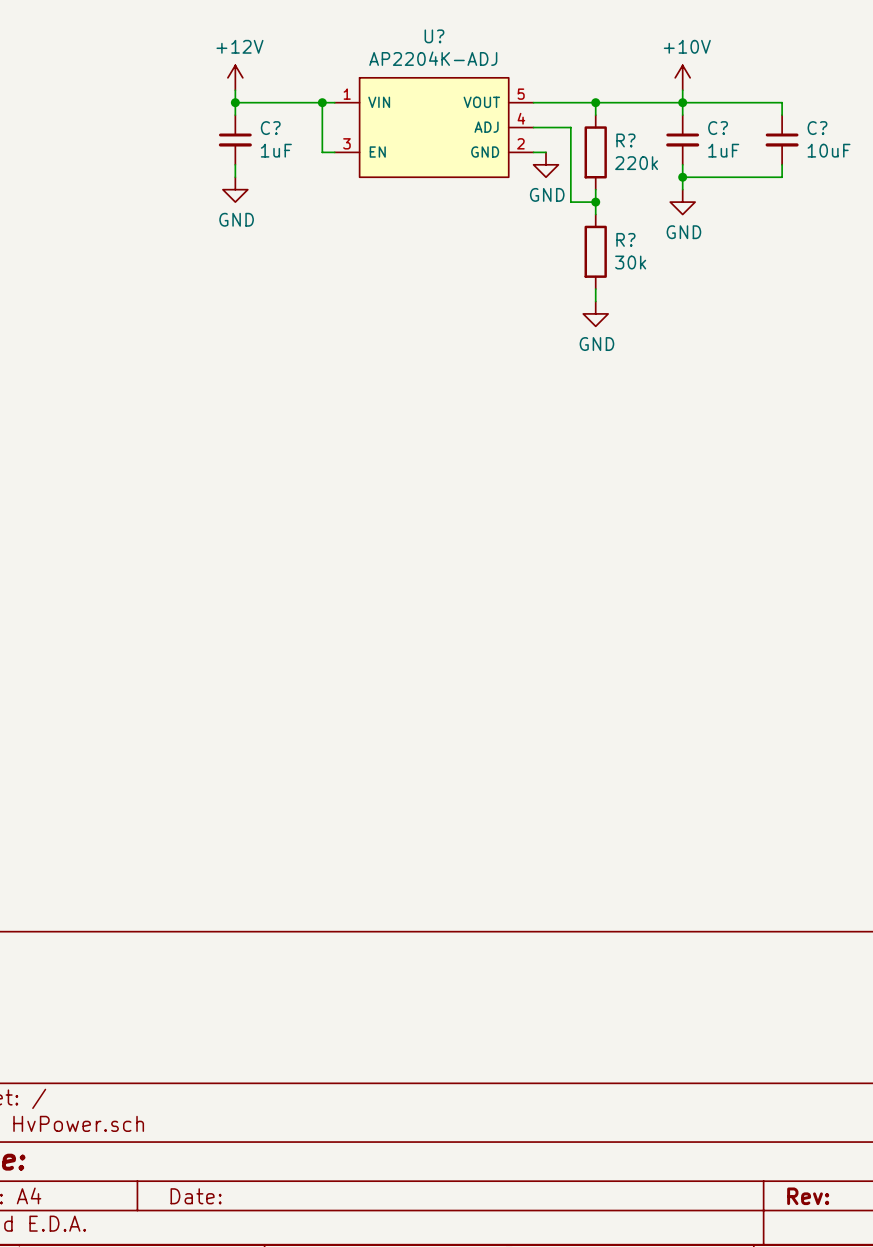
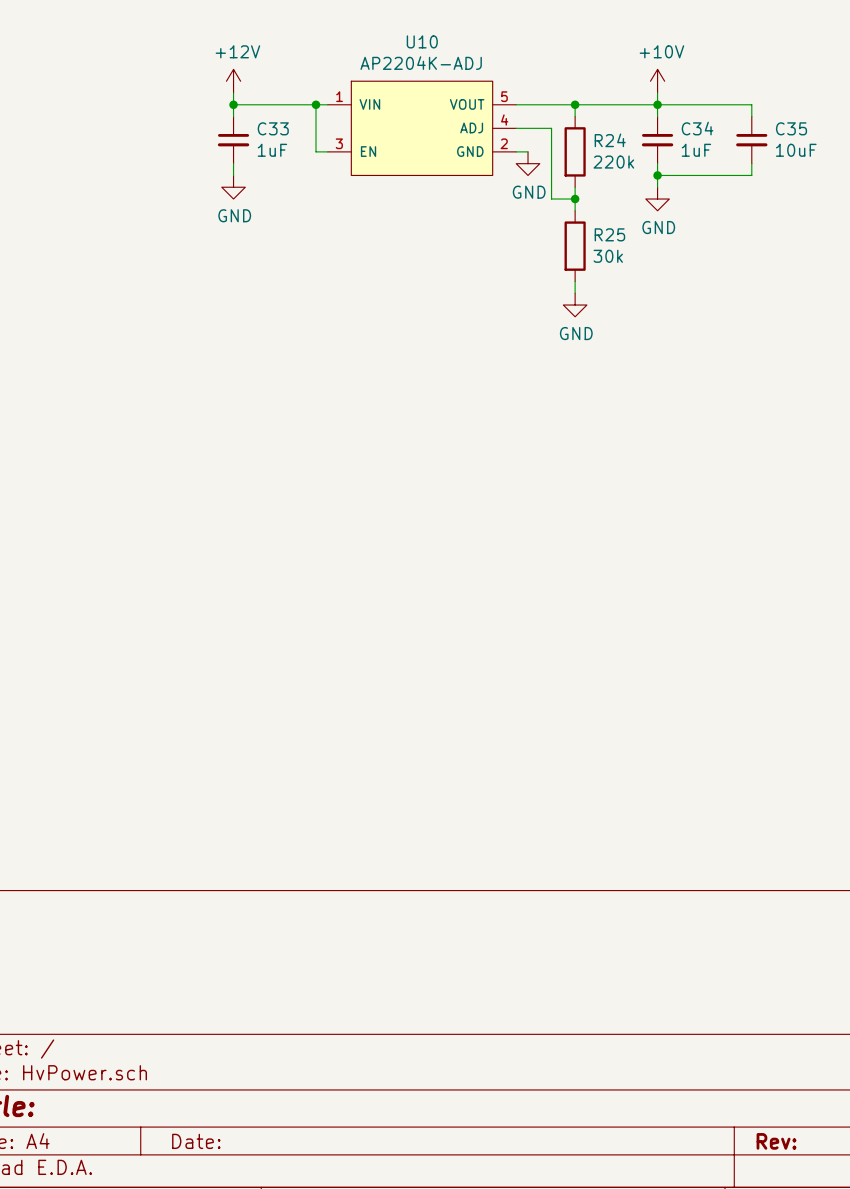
U? name: U? (434, 36) -> U10 (422, 41)
C? name: C? (270, 128) -> C33 (273, 128)
C? name: C? (718, 128) -> C34 (697, 128)
C? name: C? (817, 128) -> C35 (791, 128)
R? name: R? (625, 140) -> R24 (610, 140)
R? name: R? (625, 239) -> R25 (609, 234)

